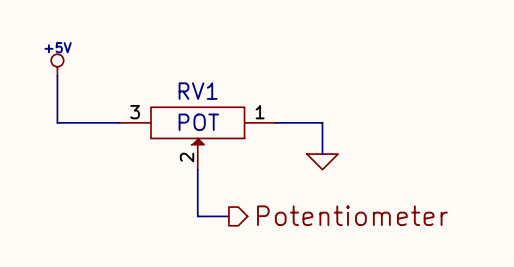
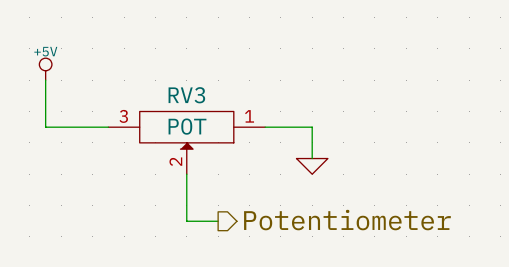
RV1 name: RV1 (198, 91) -> RV3 (186, 95)

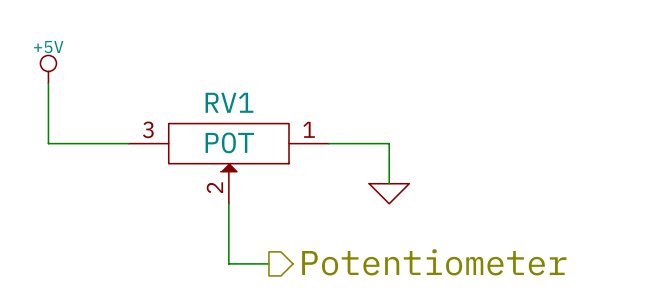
RV3 name: RV3 (186, 95) -> RV1 (229, 102)

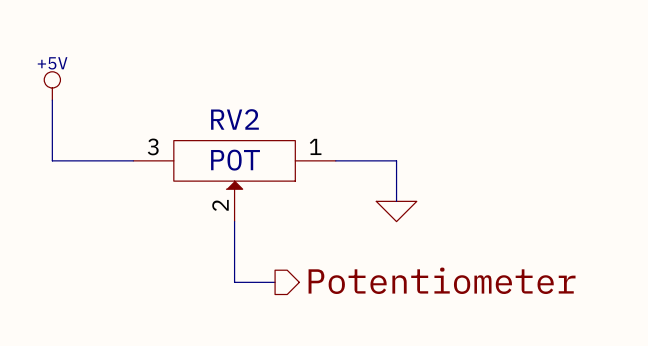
RV1 name: RV1 (229, 102) -> RV2 (234, 119)

